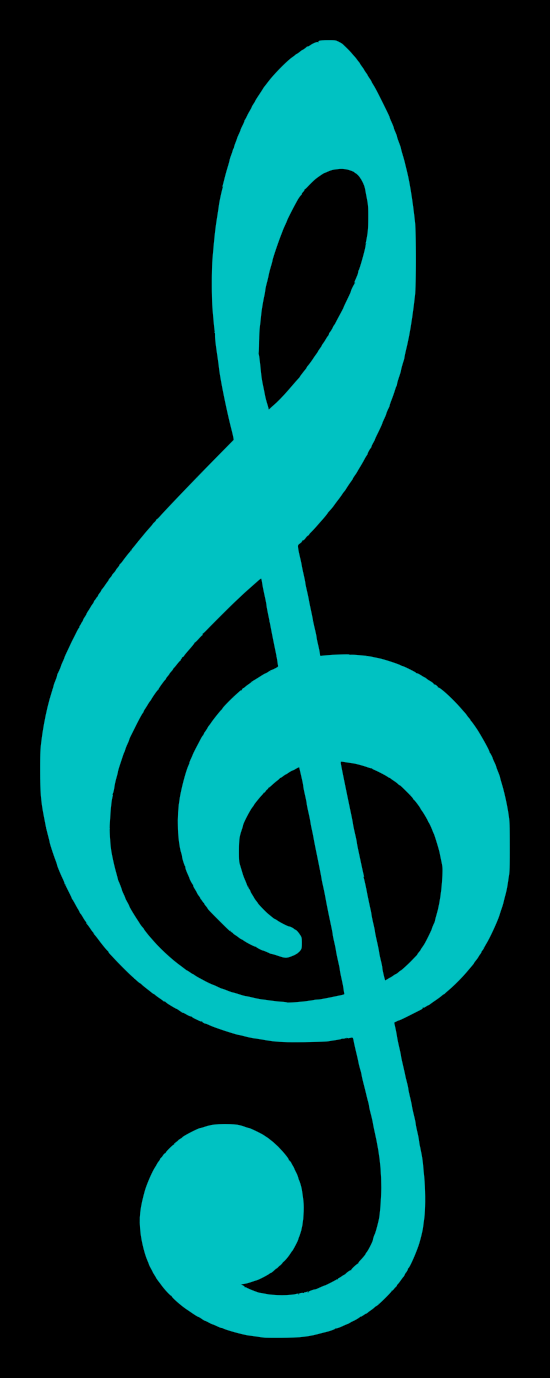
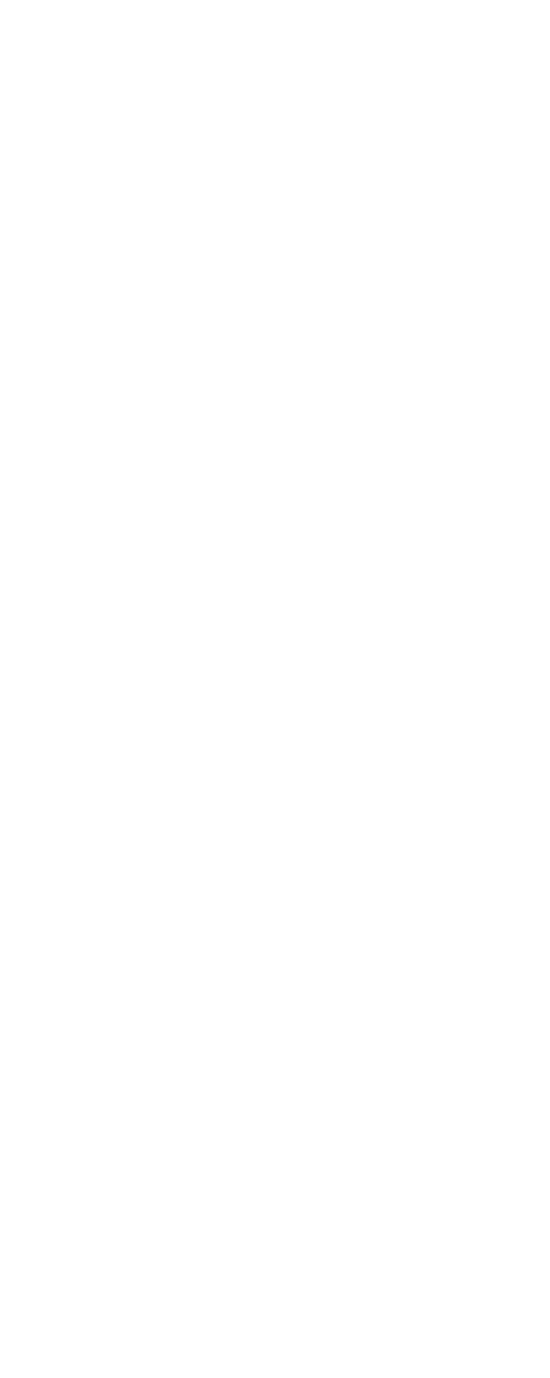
drawing: [40, 40, 510, 1338] -> none

